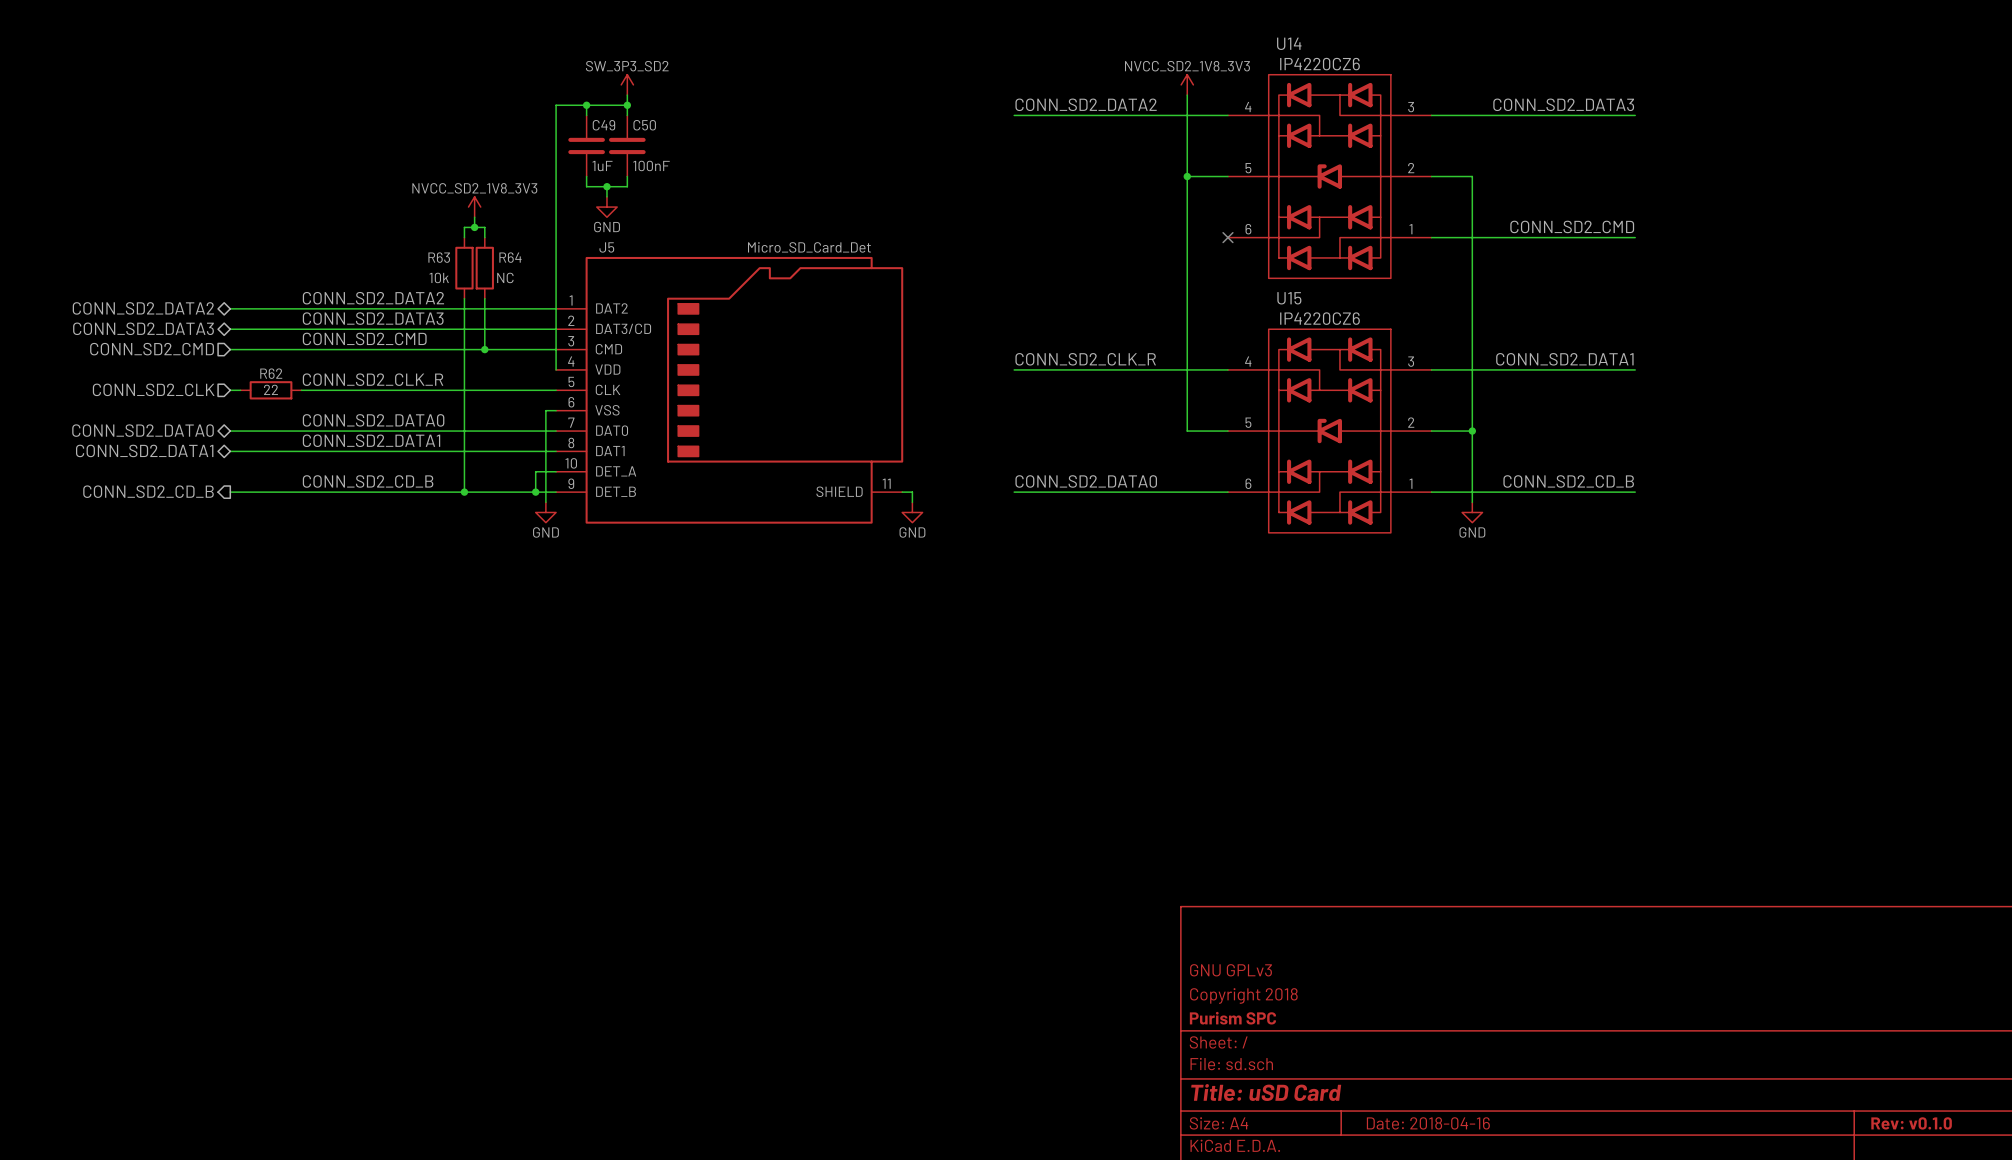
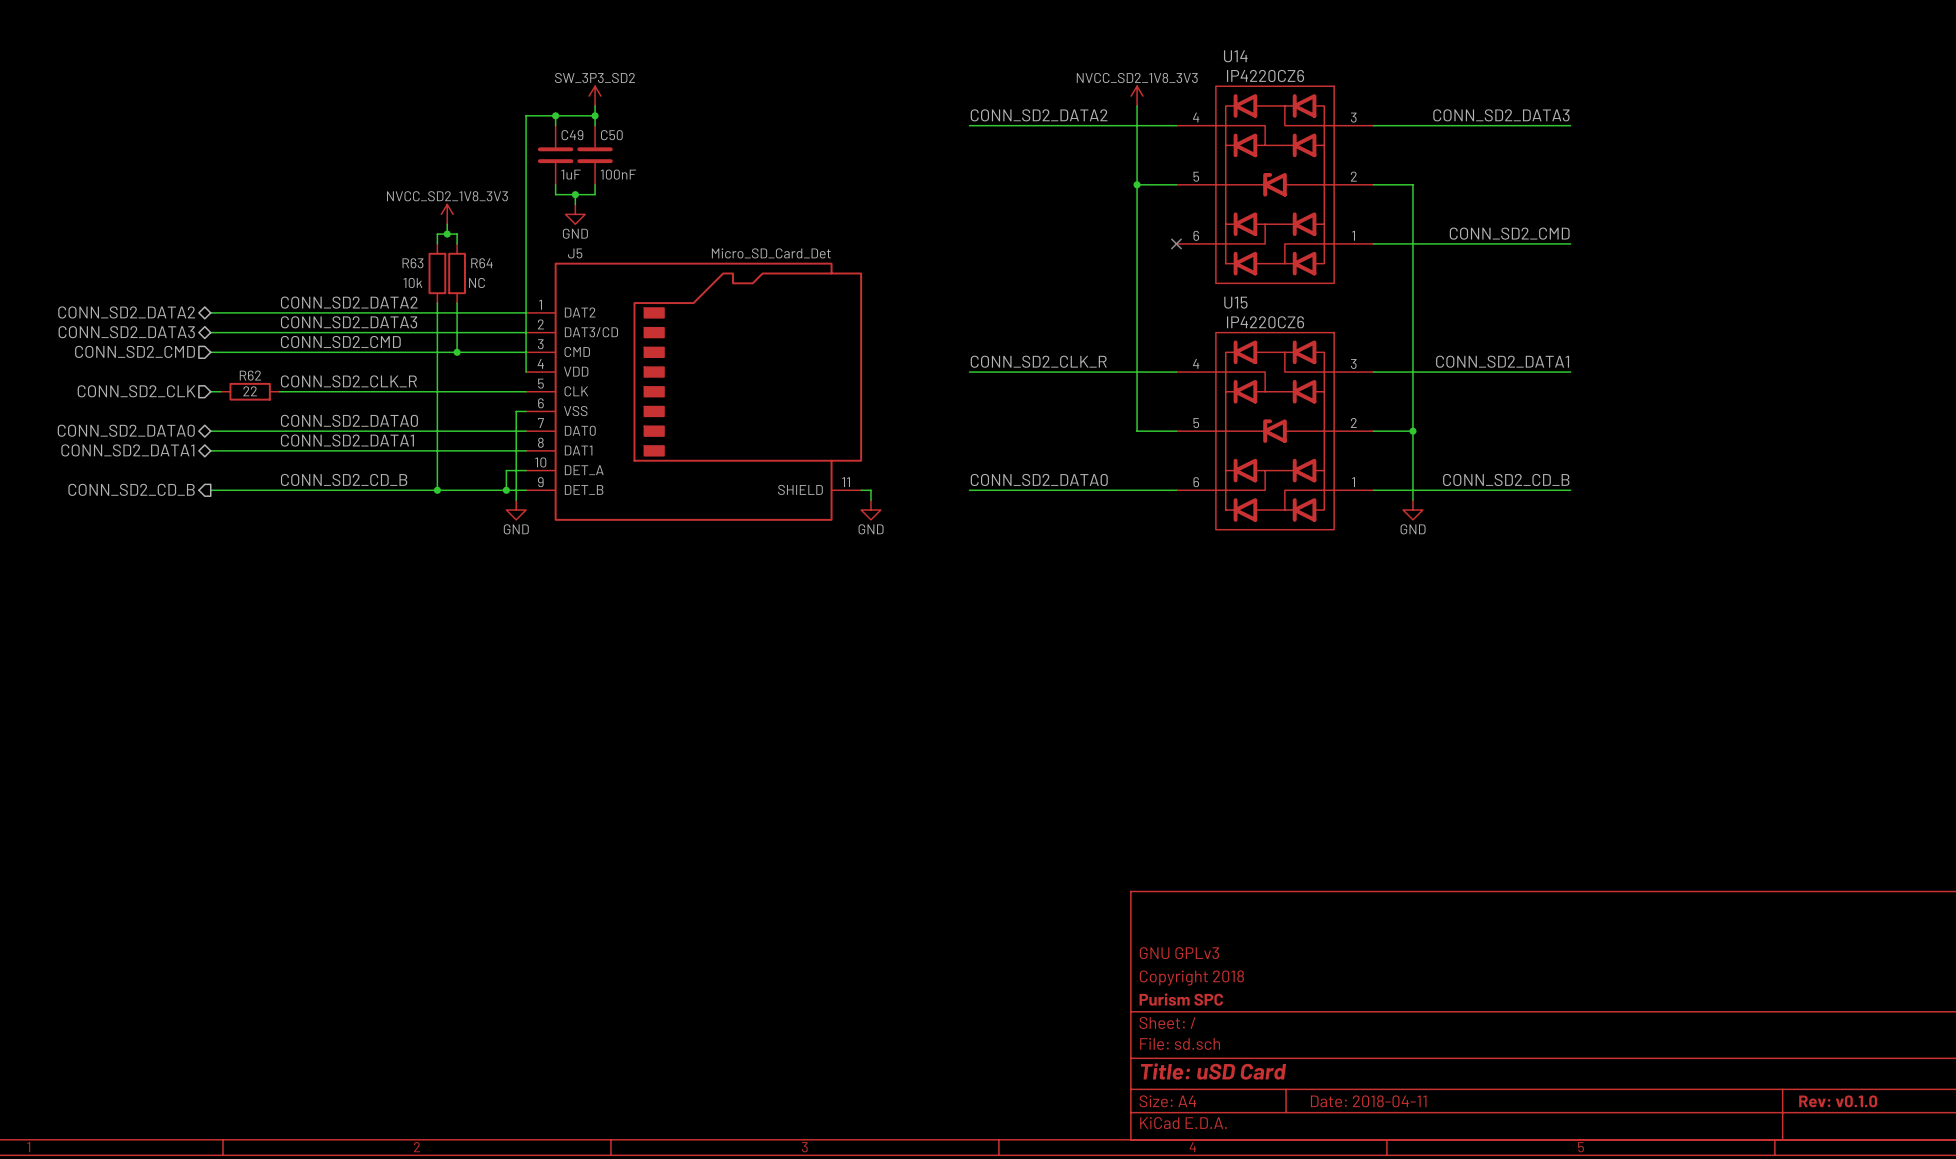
title block: Date: 2018-04-16 (1428, 1123) -> Date: 2018-04-11 (1368, 1101)

